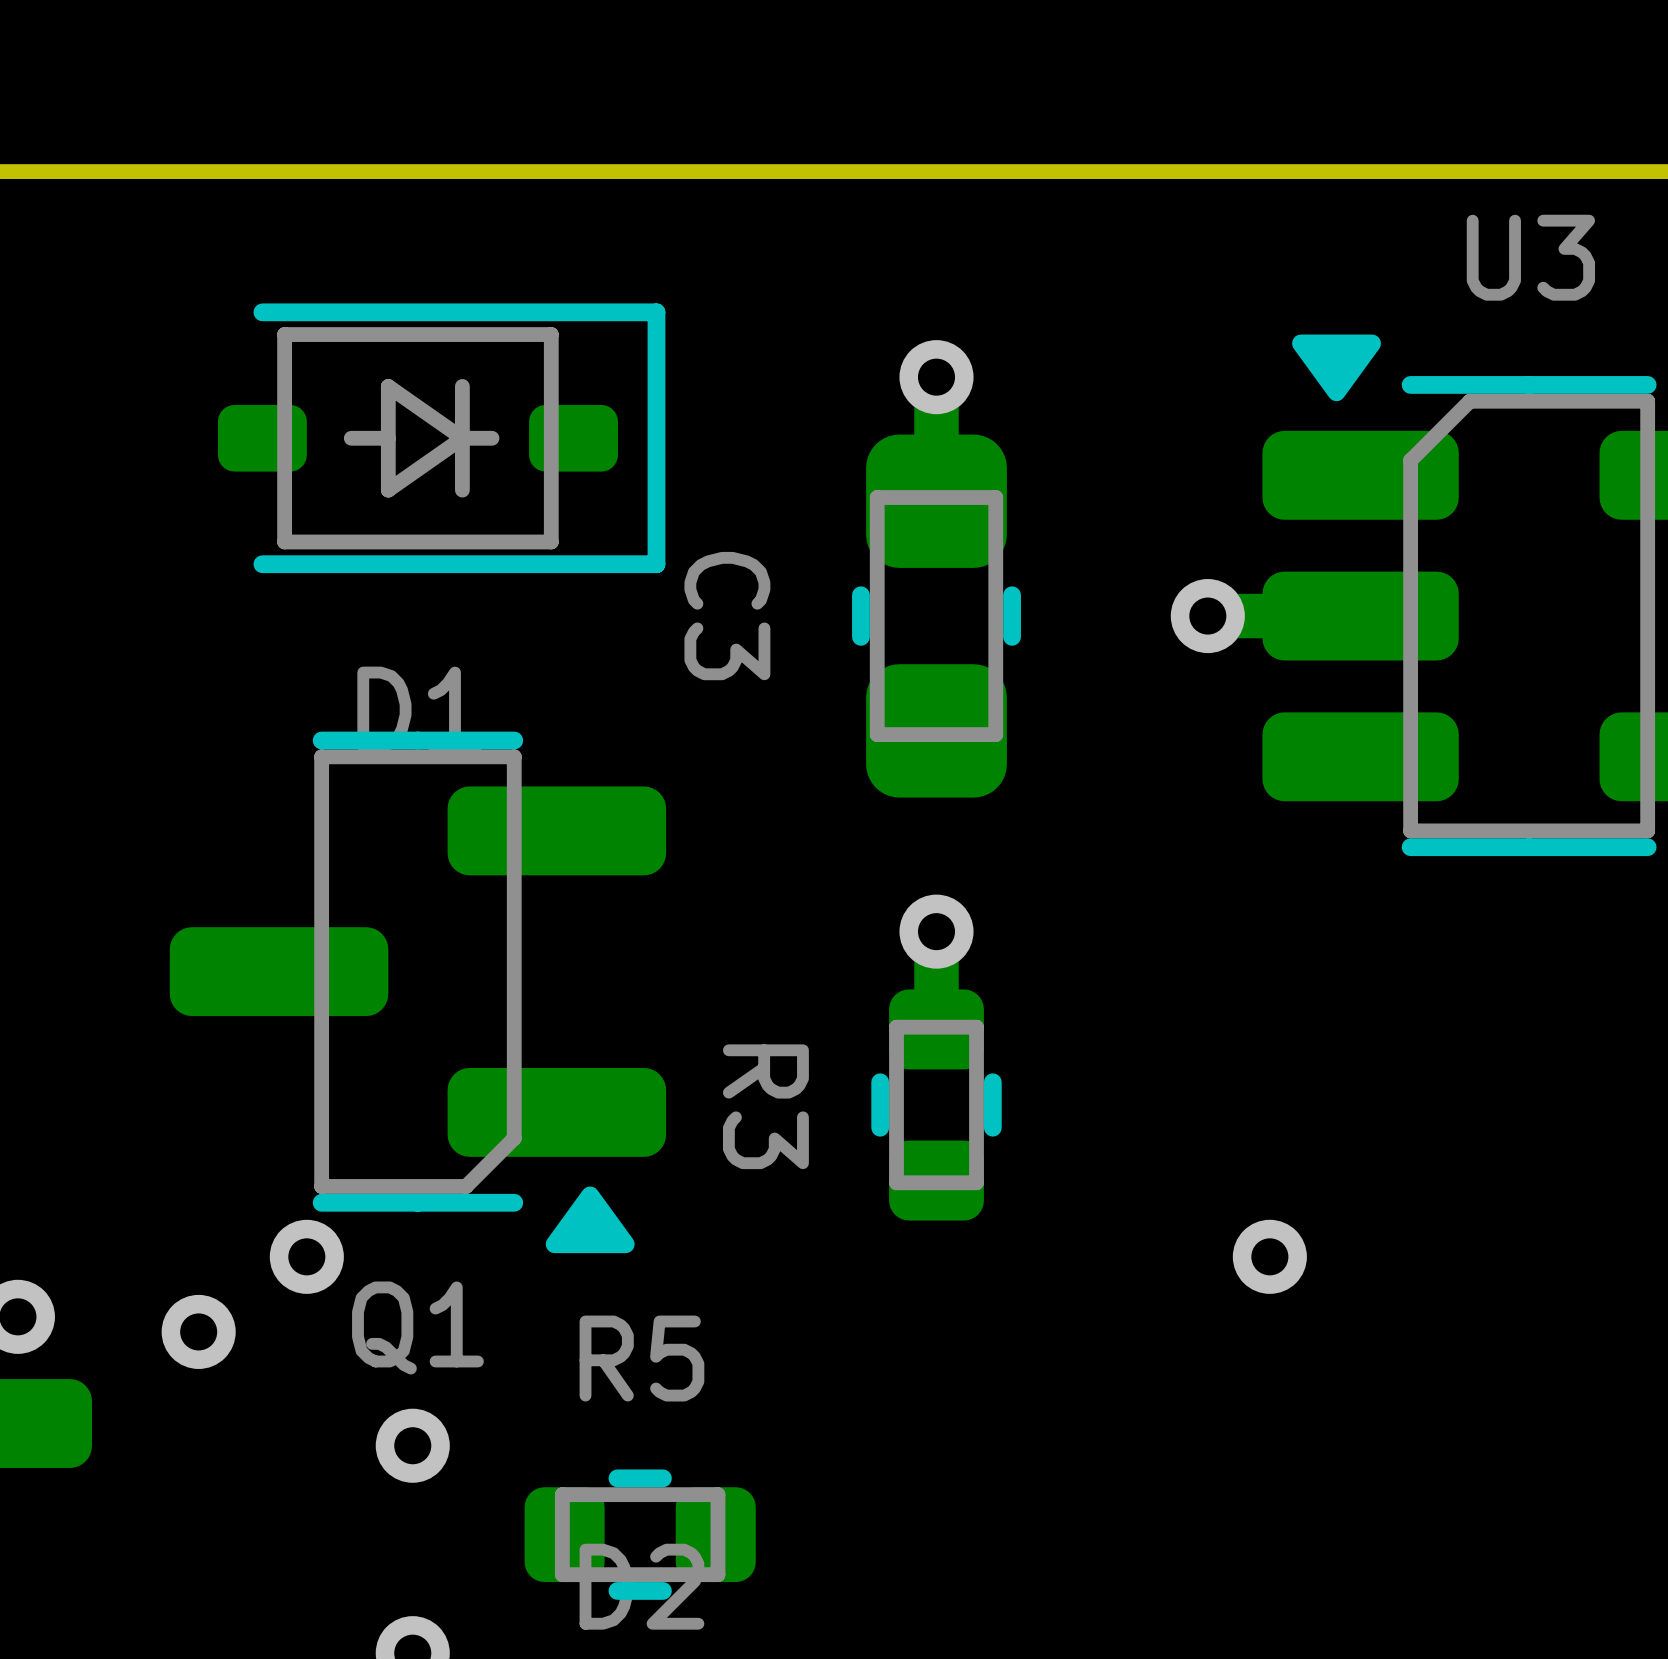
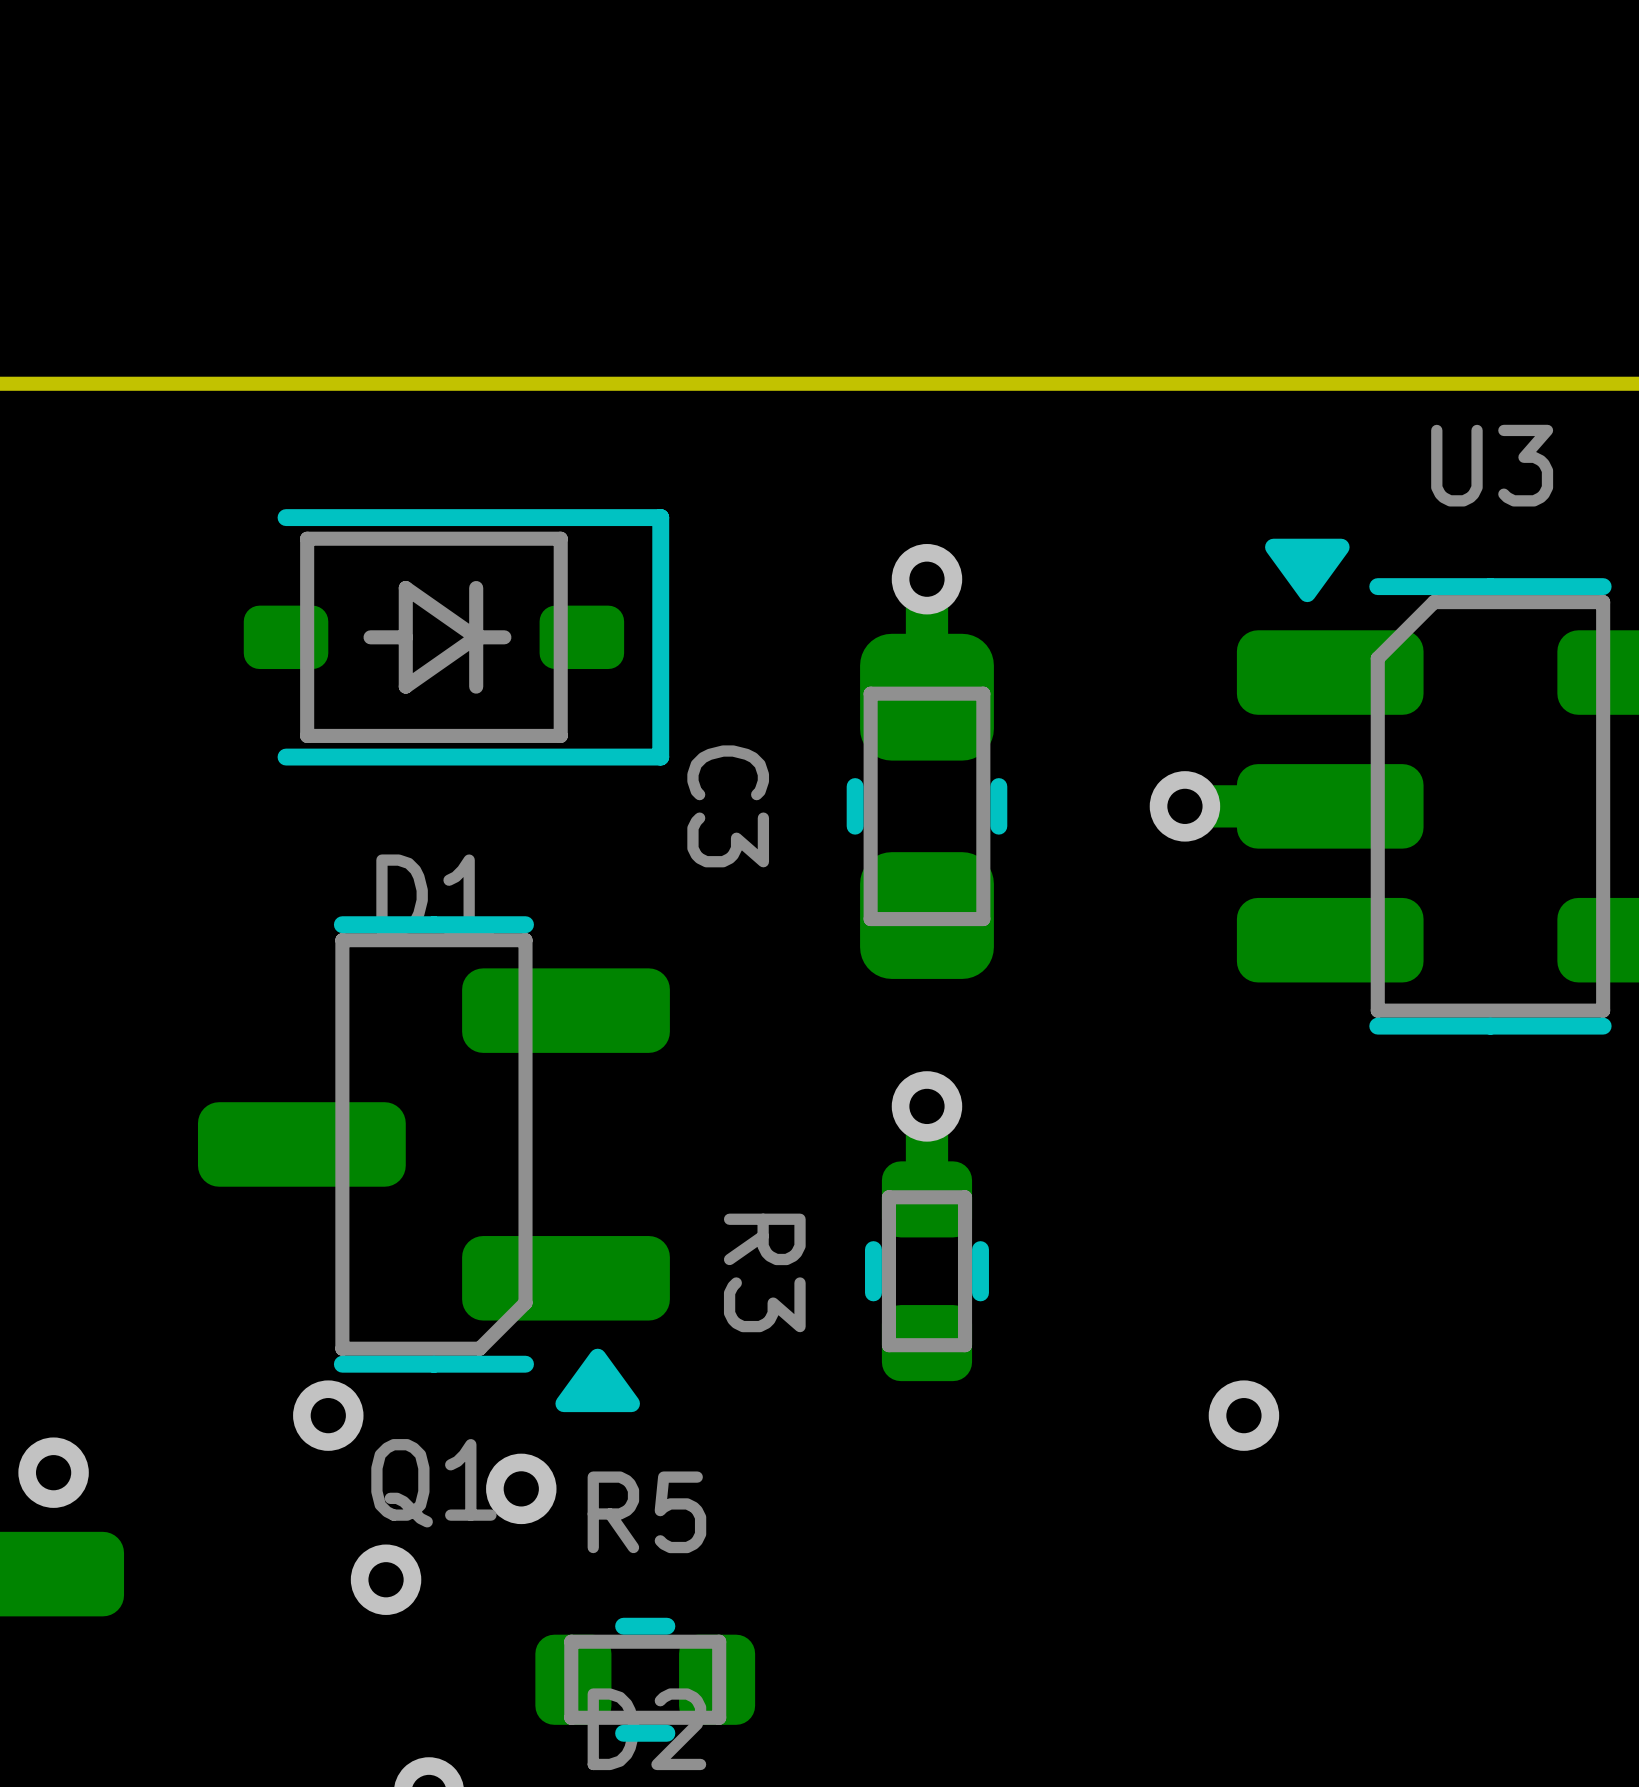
via: (198, 1331) -> none
via: none -> (521, 1488)
via position: (412, 1445) -> (386, 1579)

